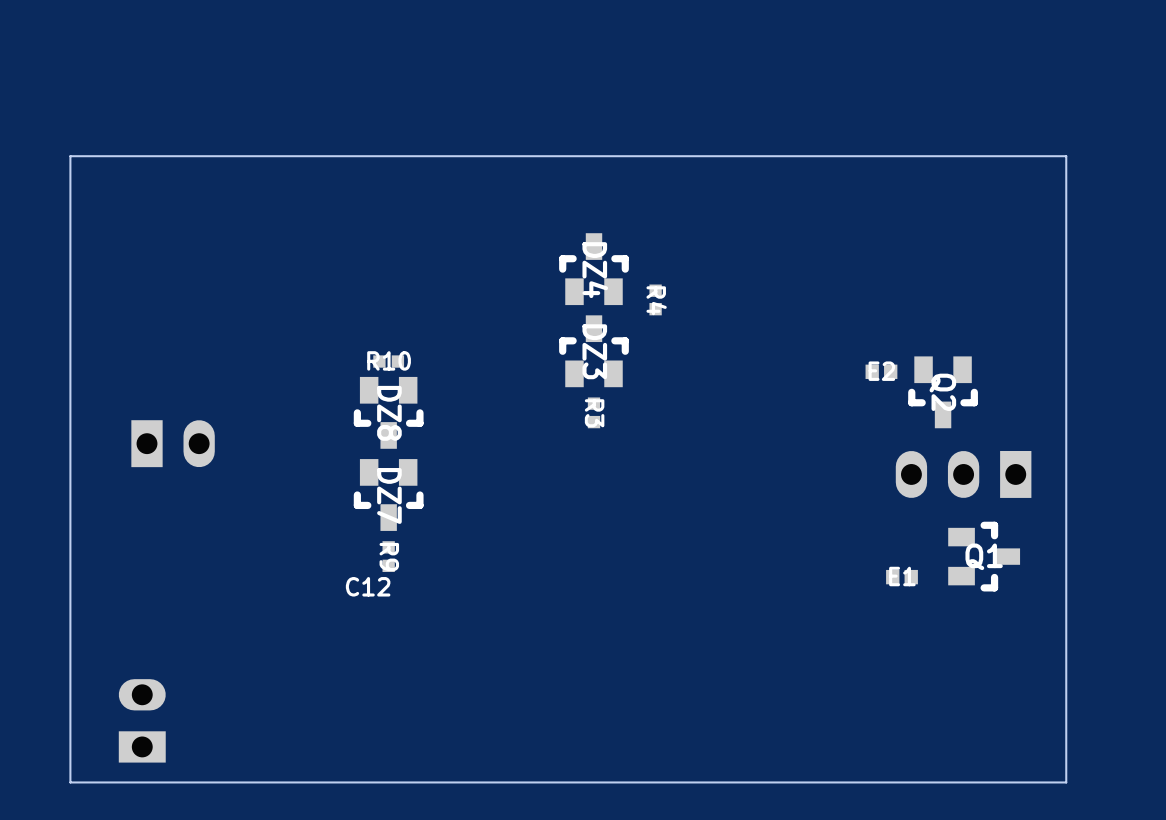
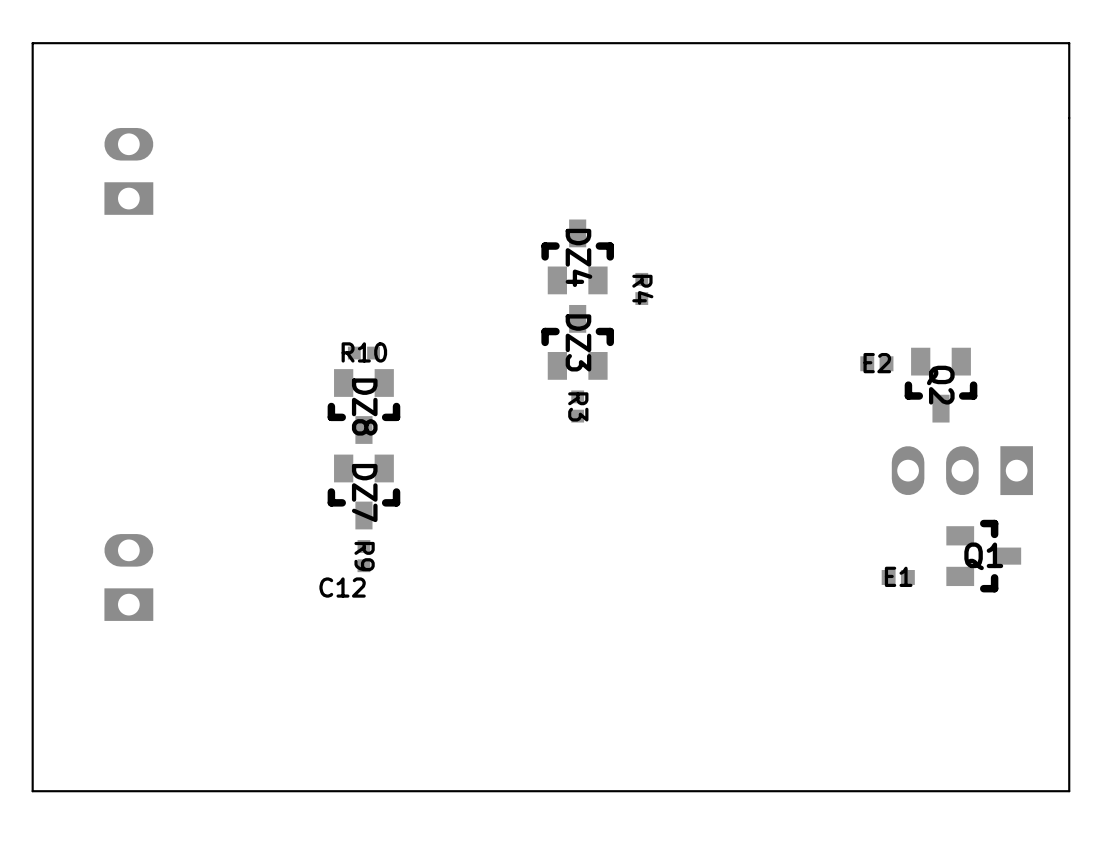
board edge: (1066, 156) (70, 156) -> (1069, 139) (1069, 43) (32, 43) (32, 139)
part: none -> (128, 171)
part: (173, 443) -> none
part: none -> (128, 577)
part: (142, 720) -> none

